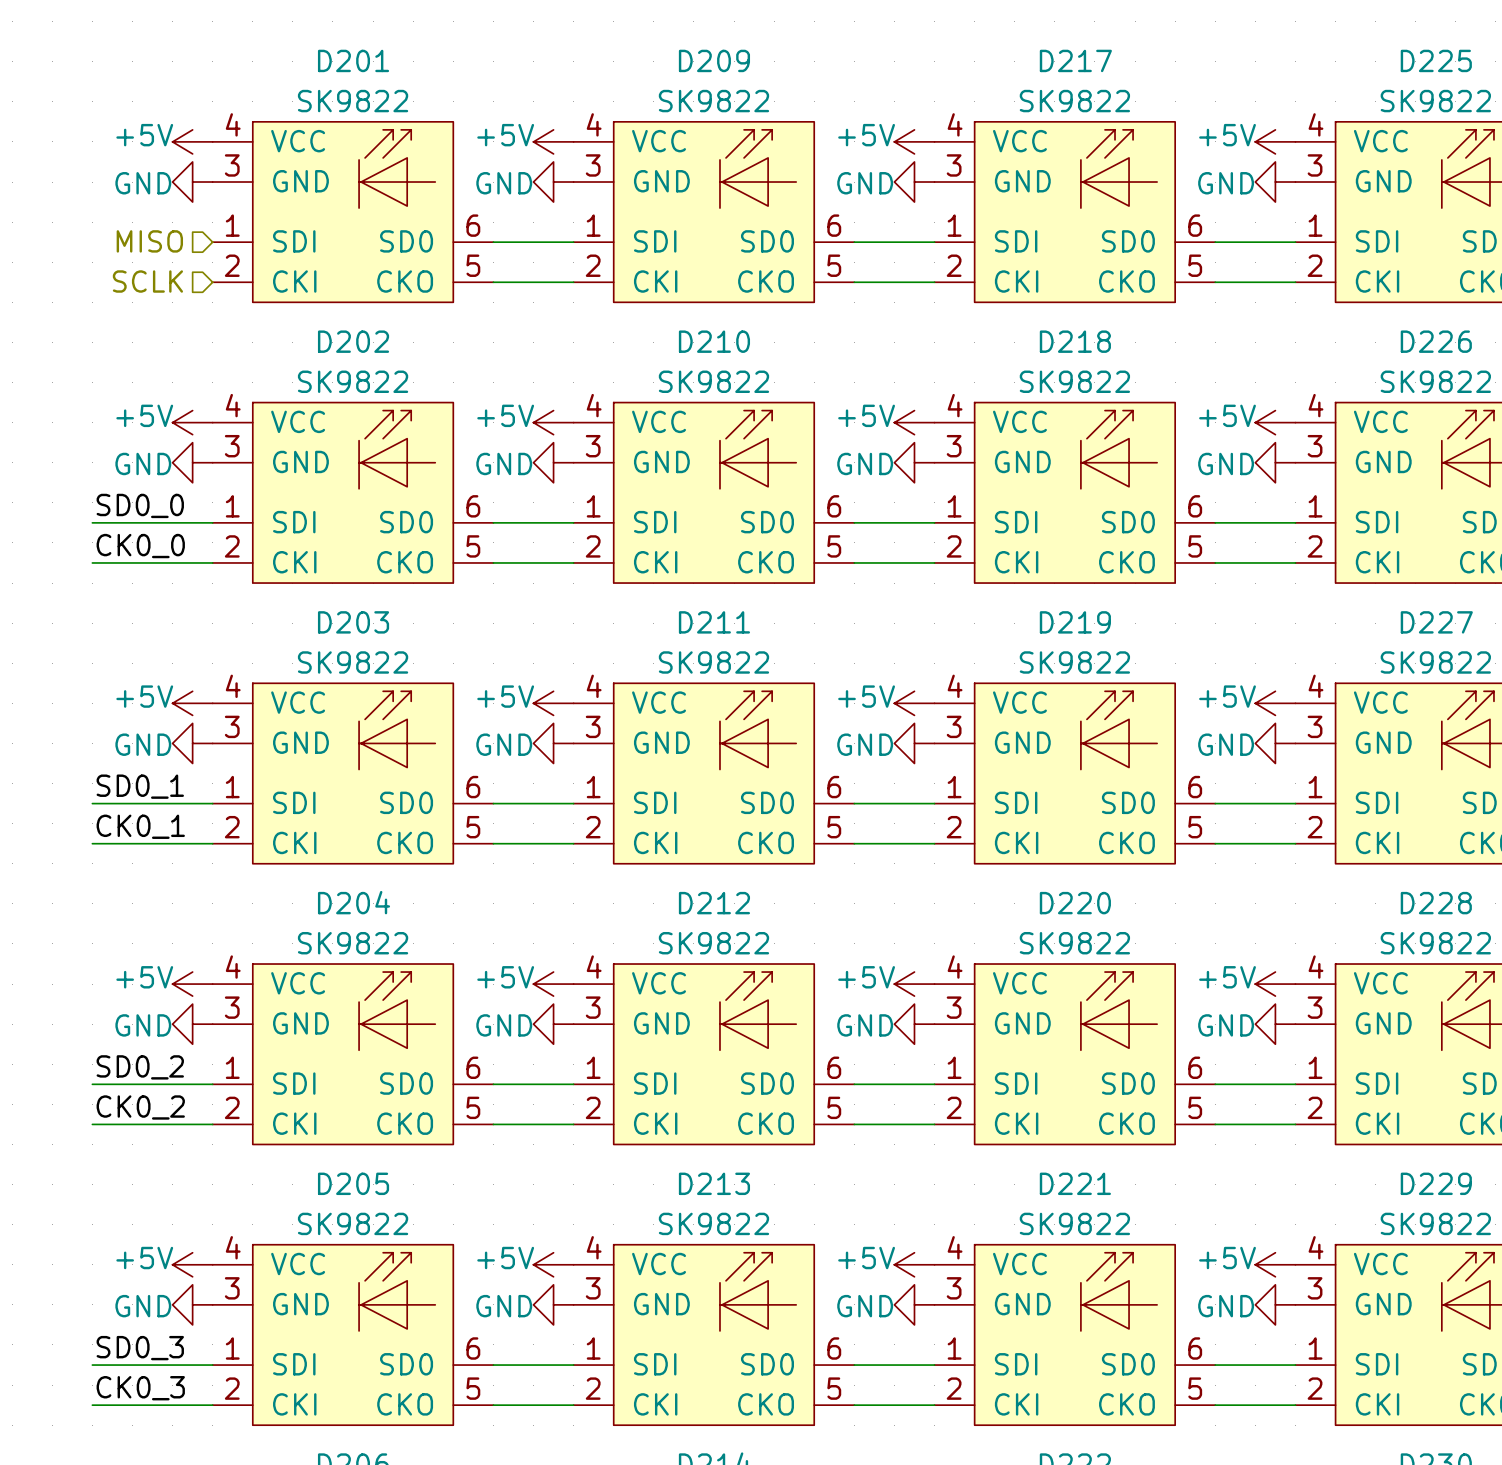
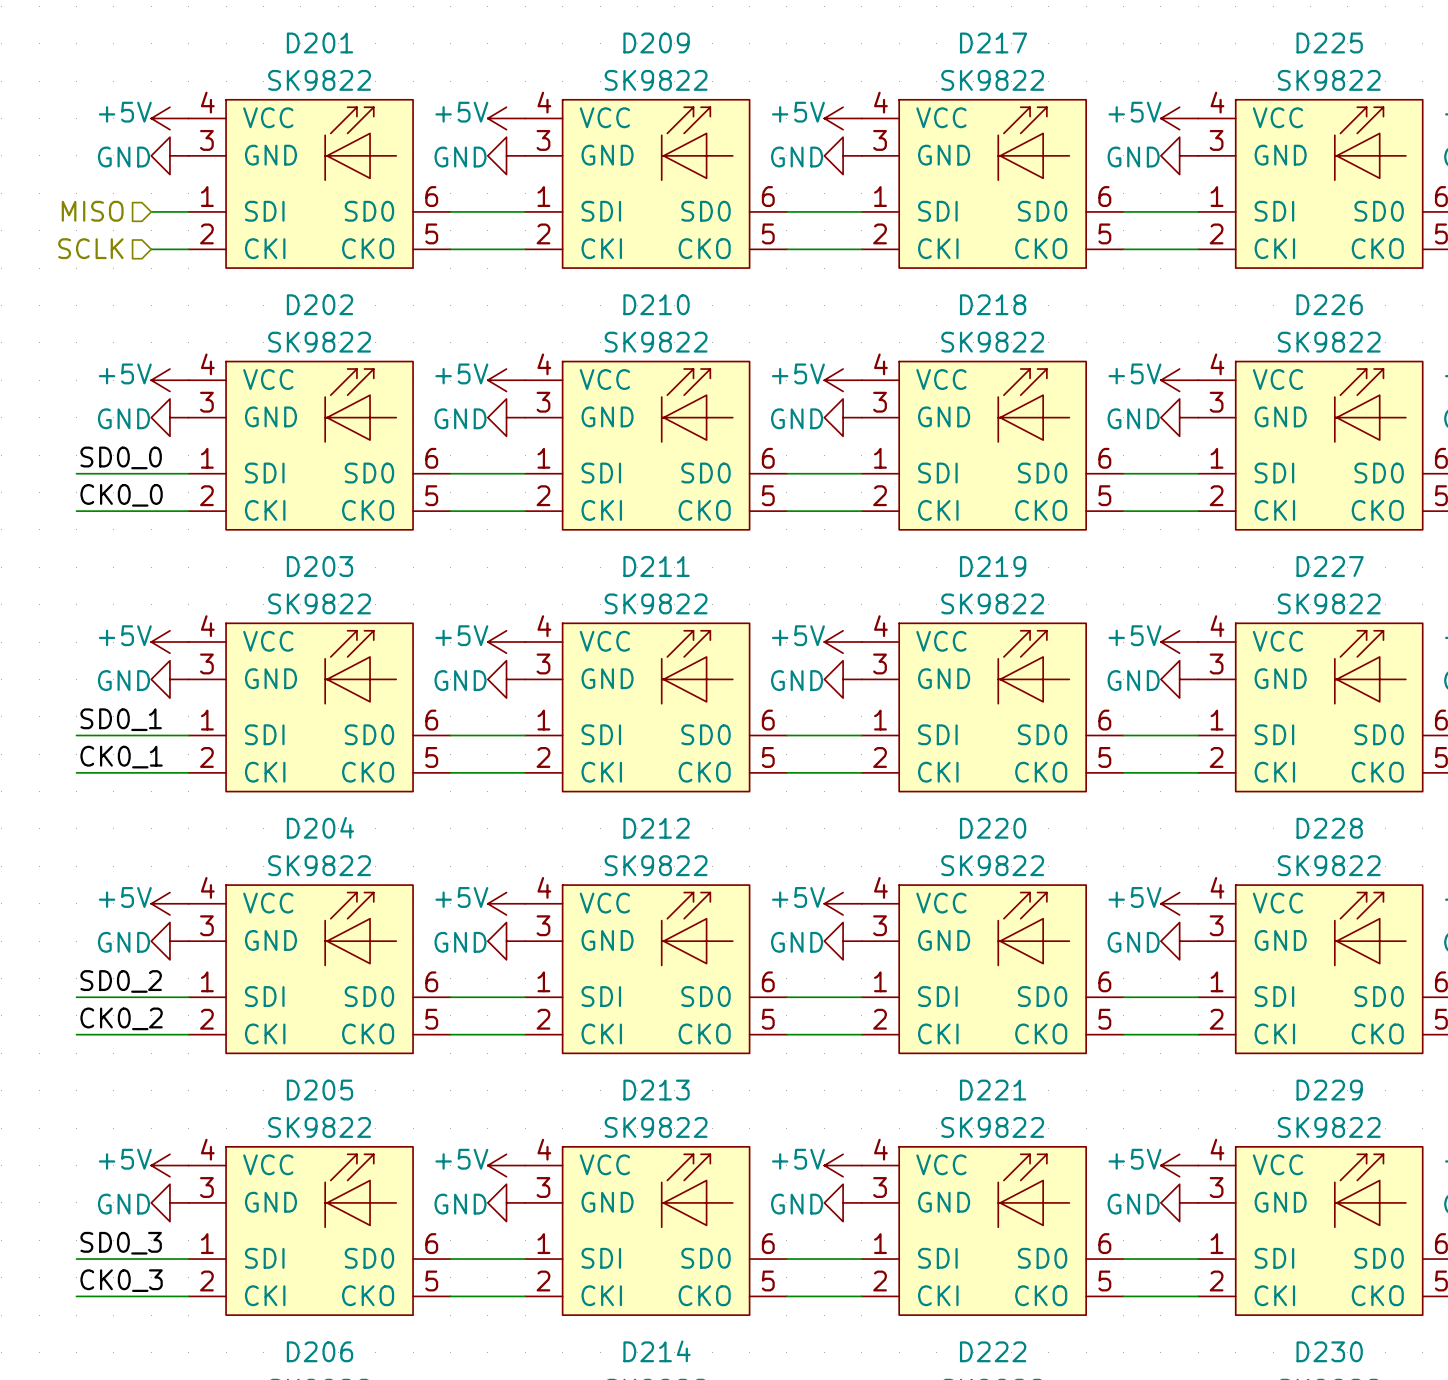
hierarchical label position: MISO (149, 241) -> MISO (92, 211)
wire: none -> (151, 211) (188, 211)
hierarchical label position: SCLK (147, 281) -> SCLK (90, 248)
wire: none -> (151, 249) (188, 249)

